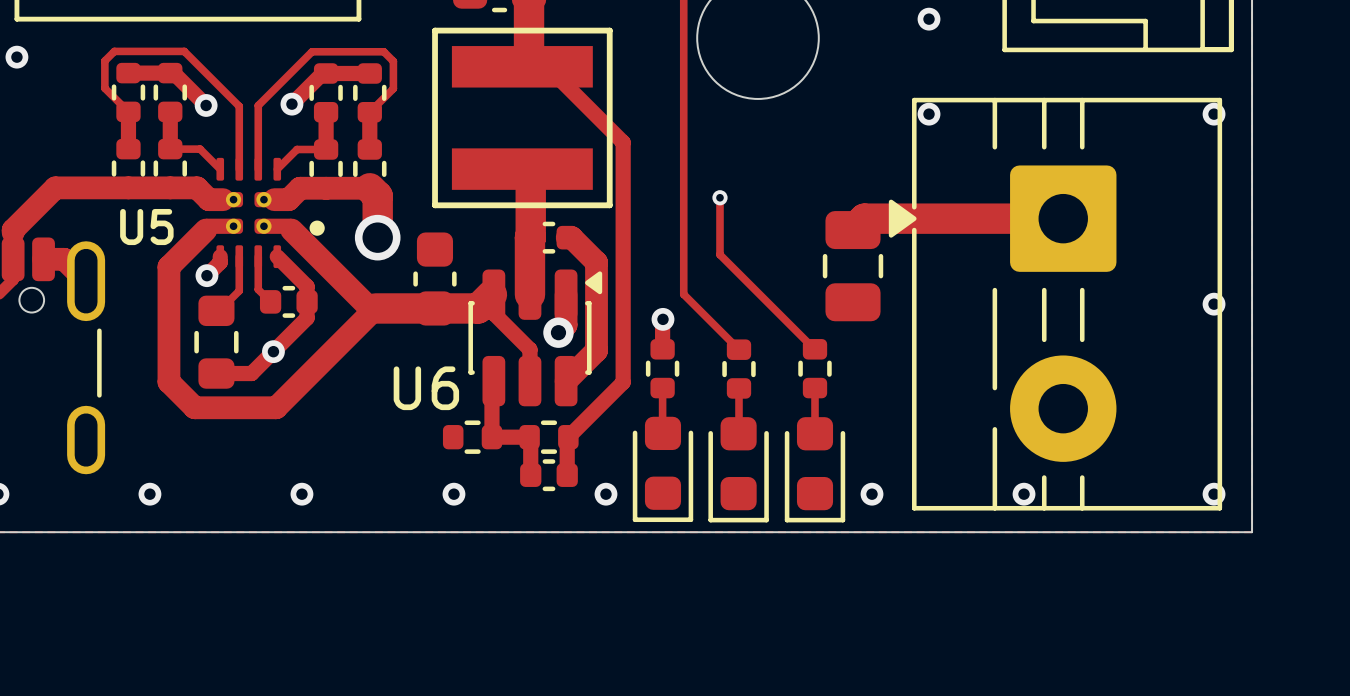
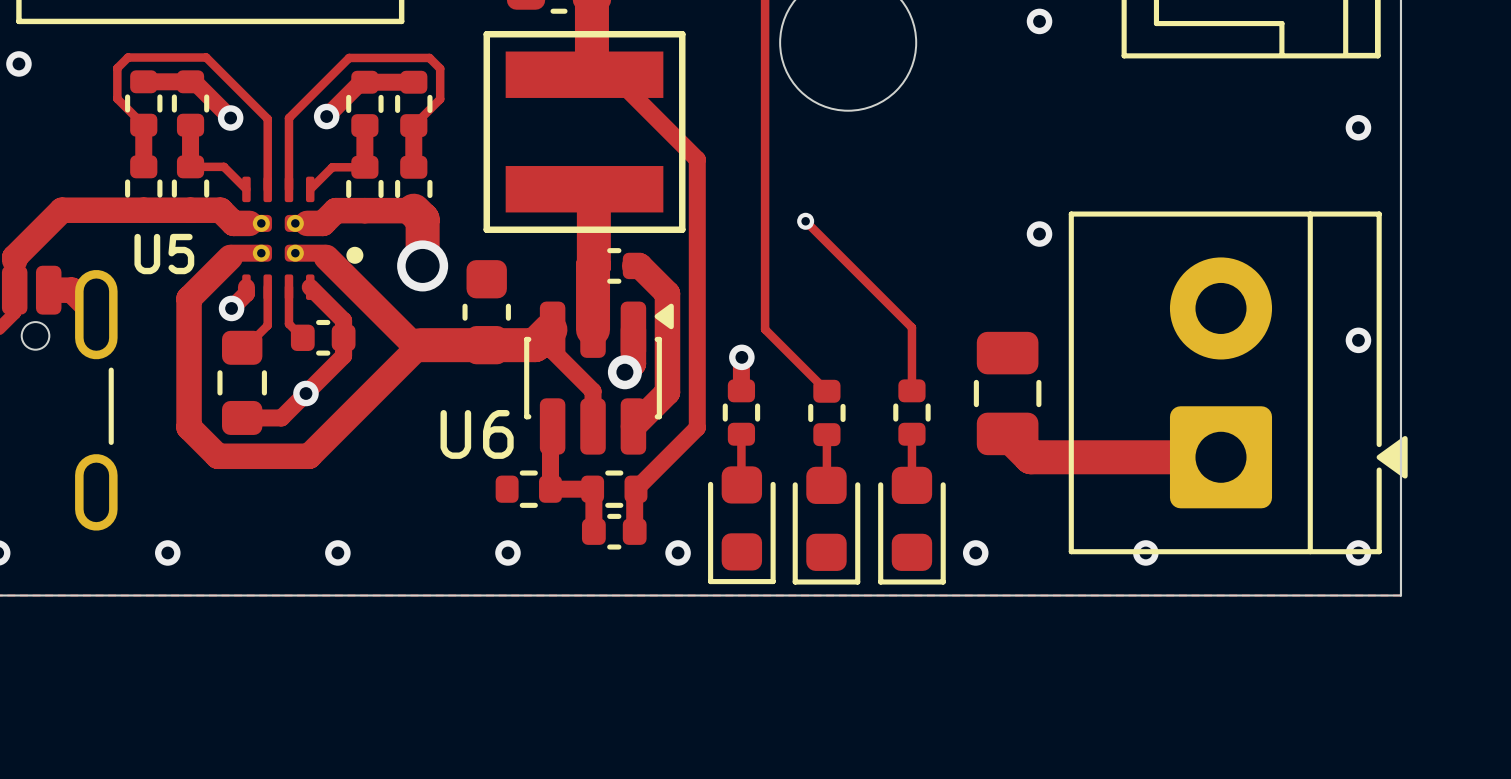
via position: (929, 114) -> (1039, 234)
track: (719, 197) (719, 254) (814, 349) -> (805, 221) (911, 327) (911, 390)
track: (1063, 218) (864, 218) (853, 230) -> none
part position: (853, 266) -> (1007, 393)
part: (1055, 304) -> none
part: none -> (1238, 382)
track: none -> (1007, 433) (1031, 457) (1220, 457)

